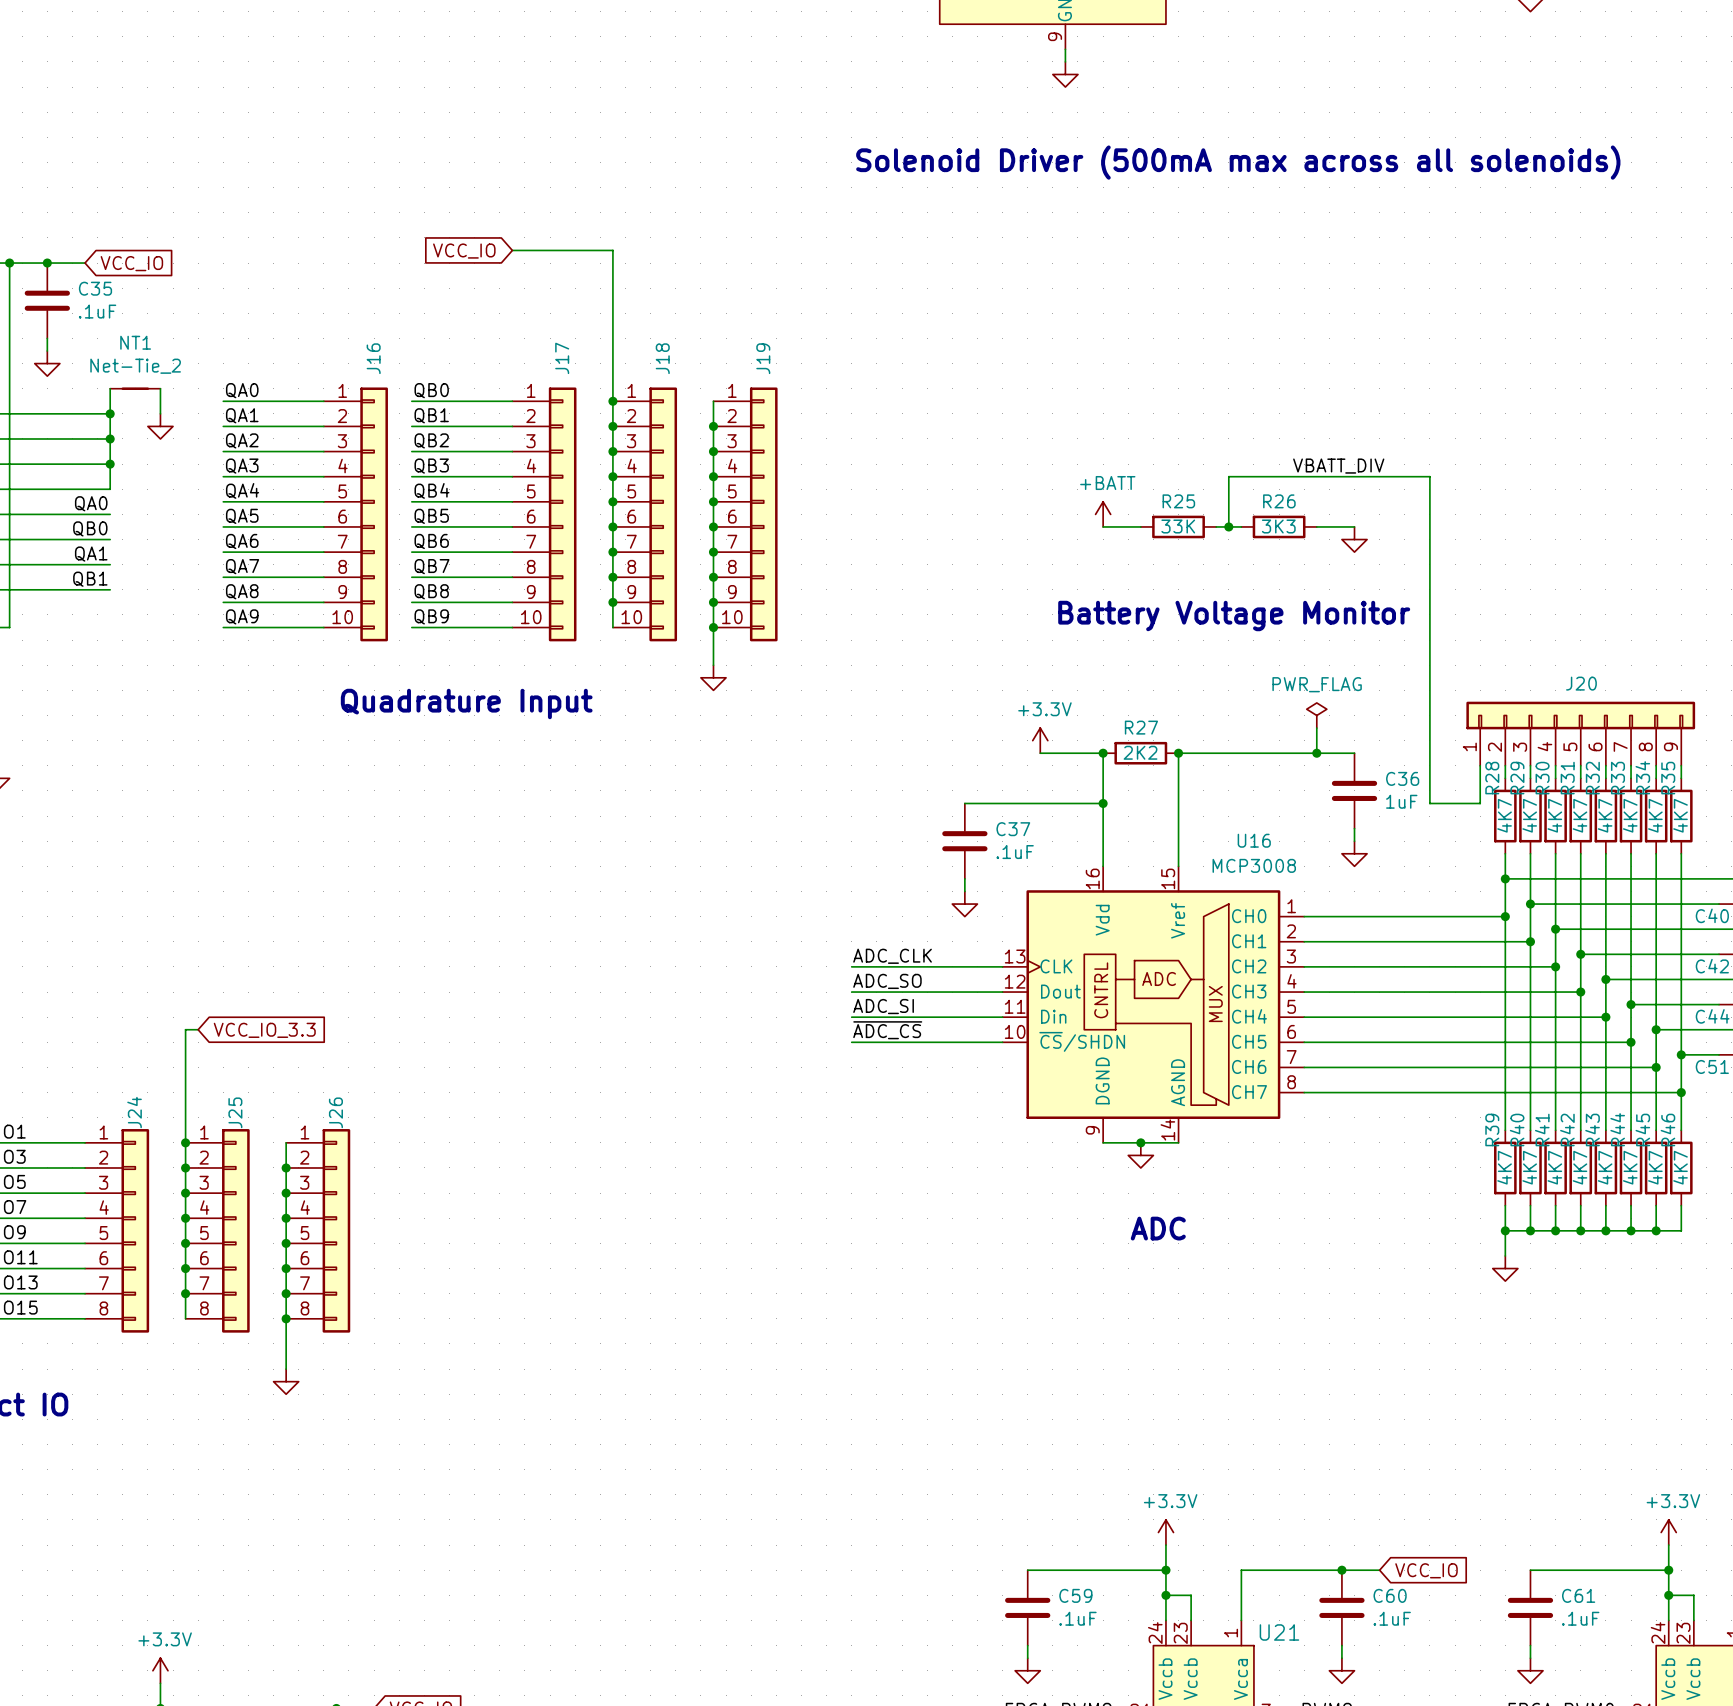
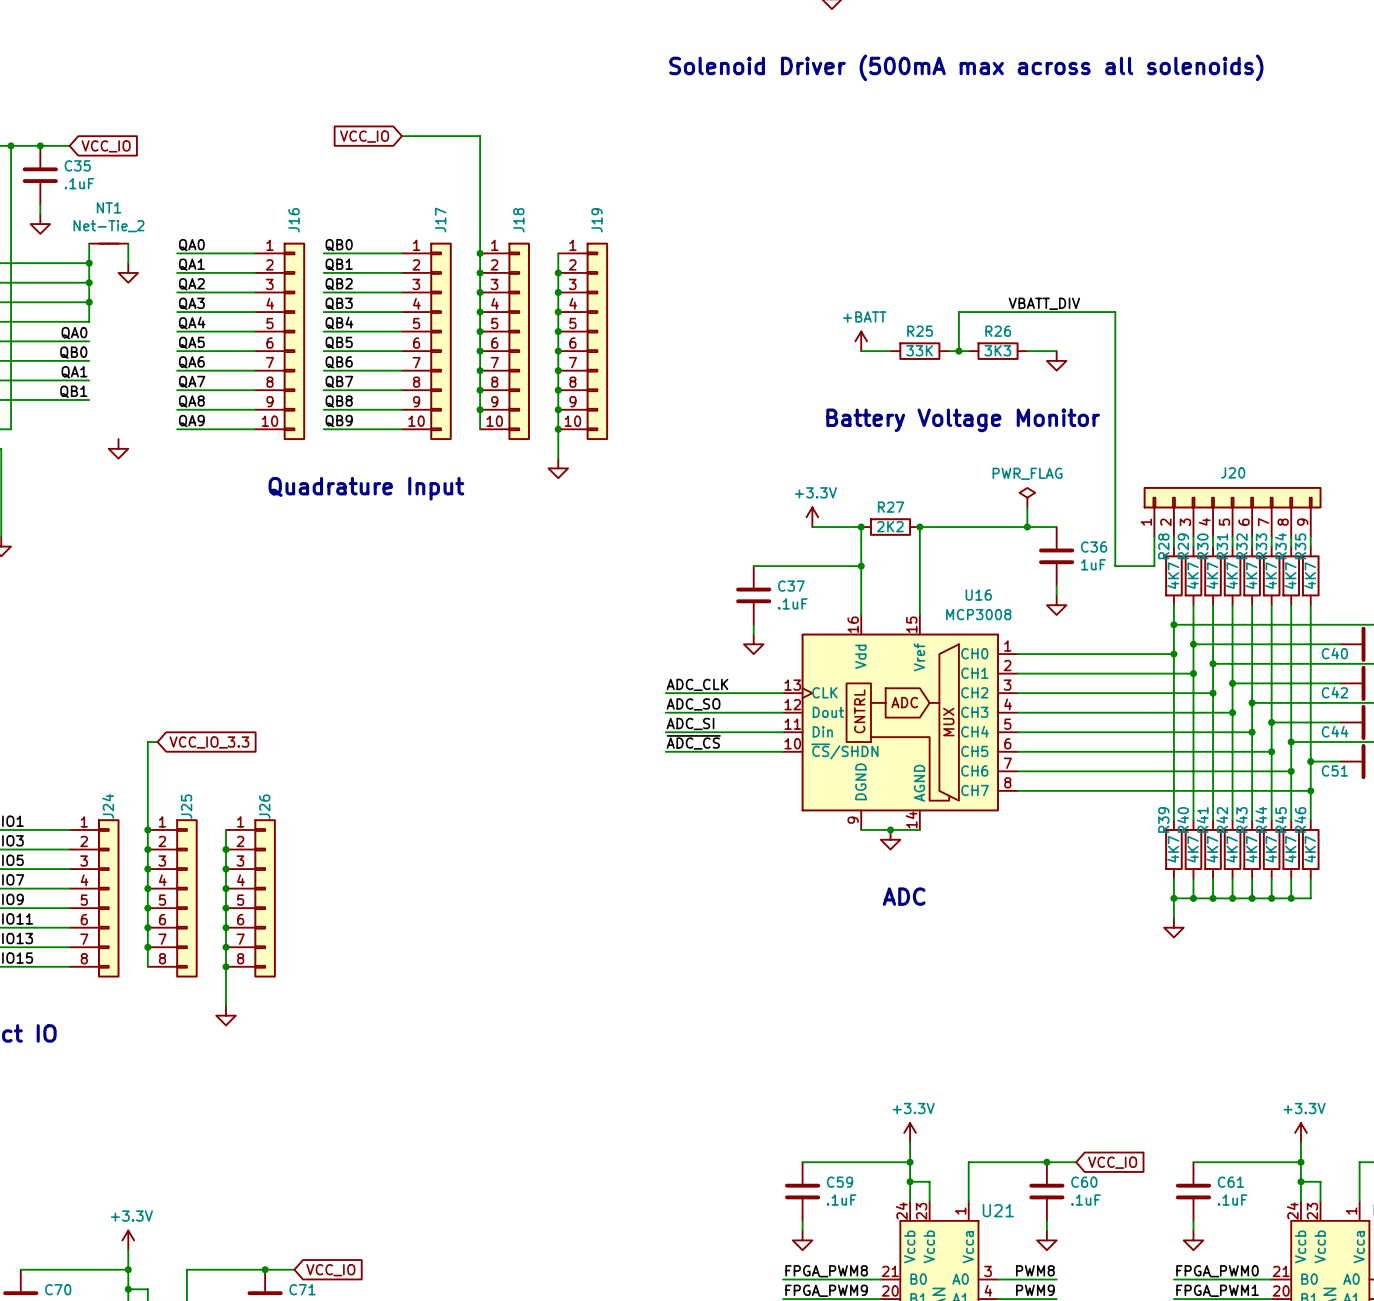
power symbol: none -> (118, 448)

